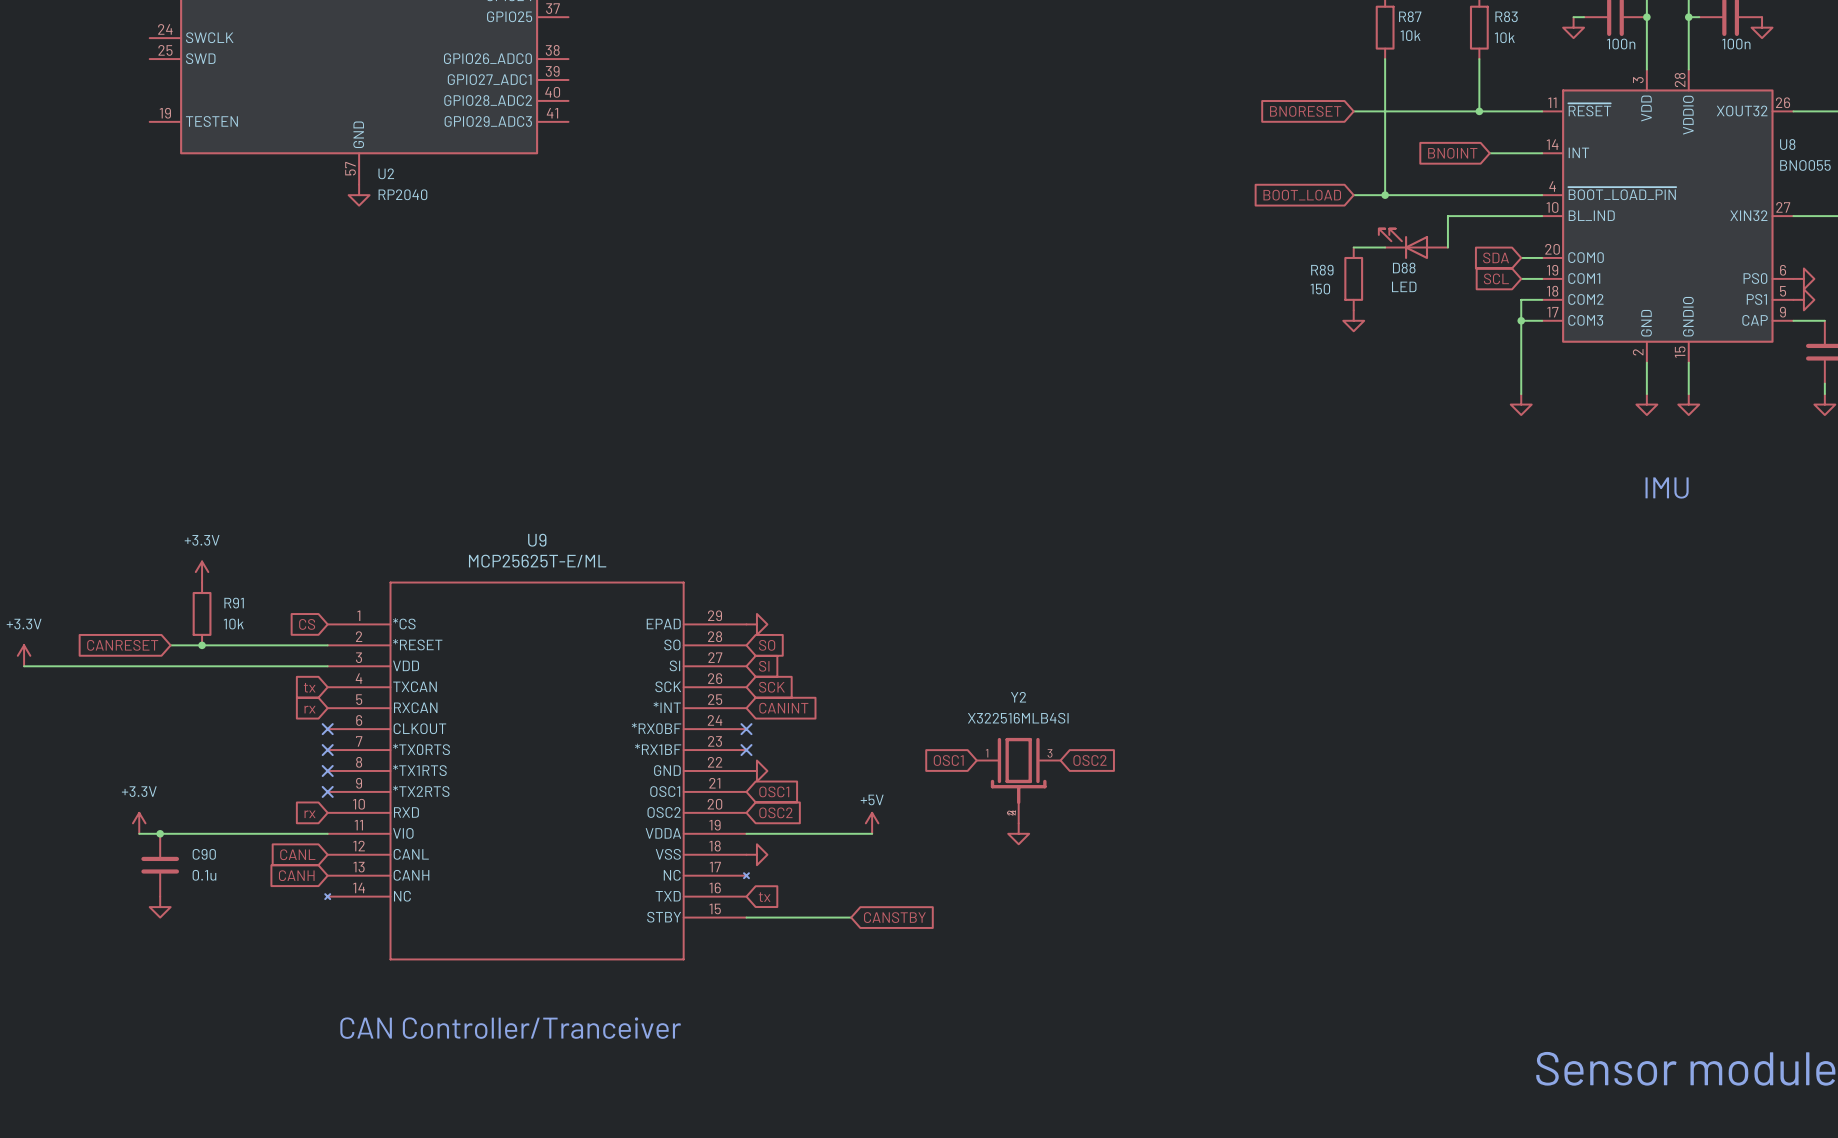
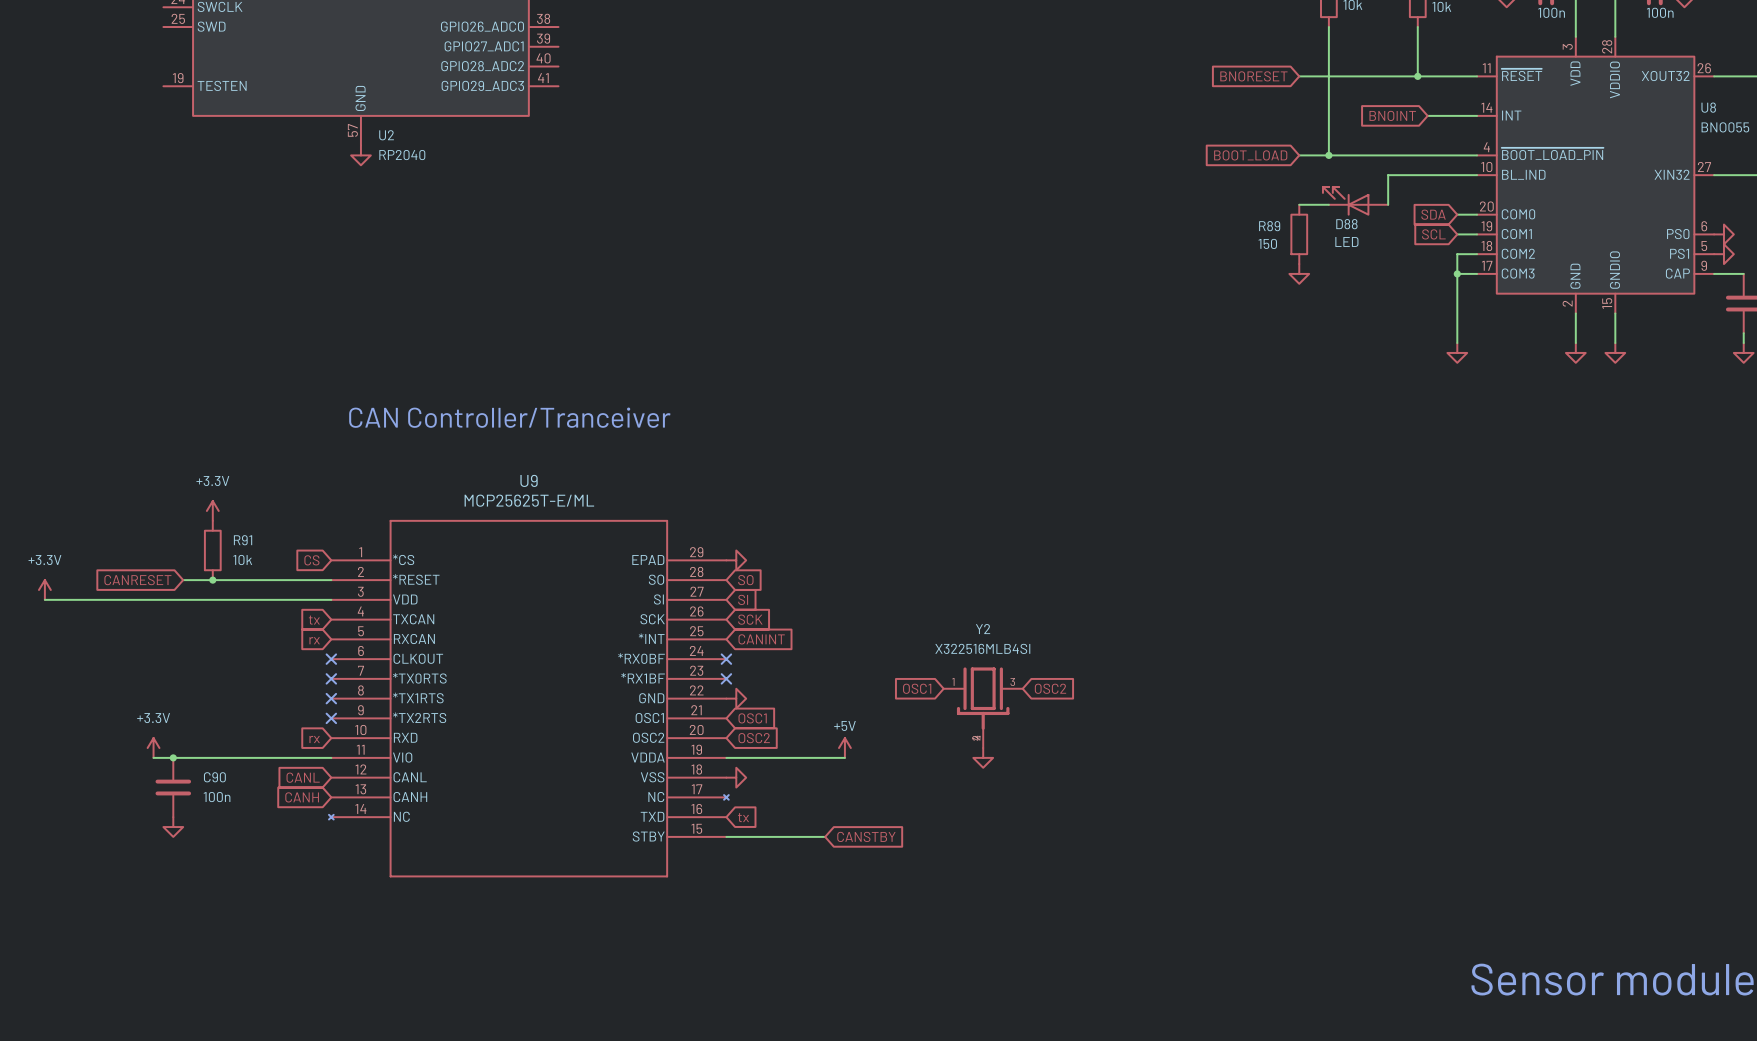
text: none -> CAN Controller/Tranceiver (509, 417)
text: IMU (1667, 487) -> none
C90 value: 0.1u (204, 875) -> 100n (217, 797)
text: CAN Controller/Tranceiver (510, 1028) -> none

